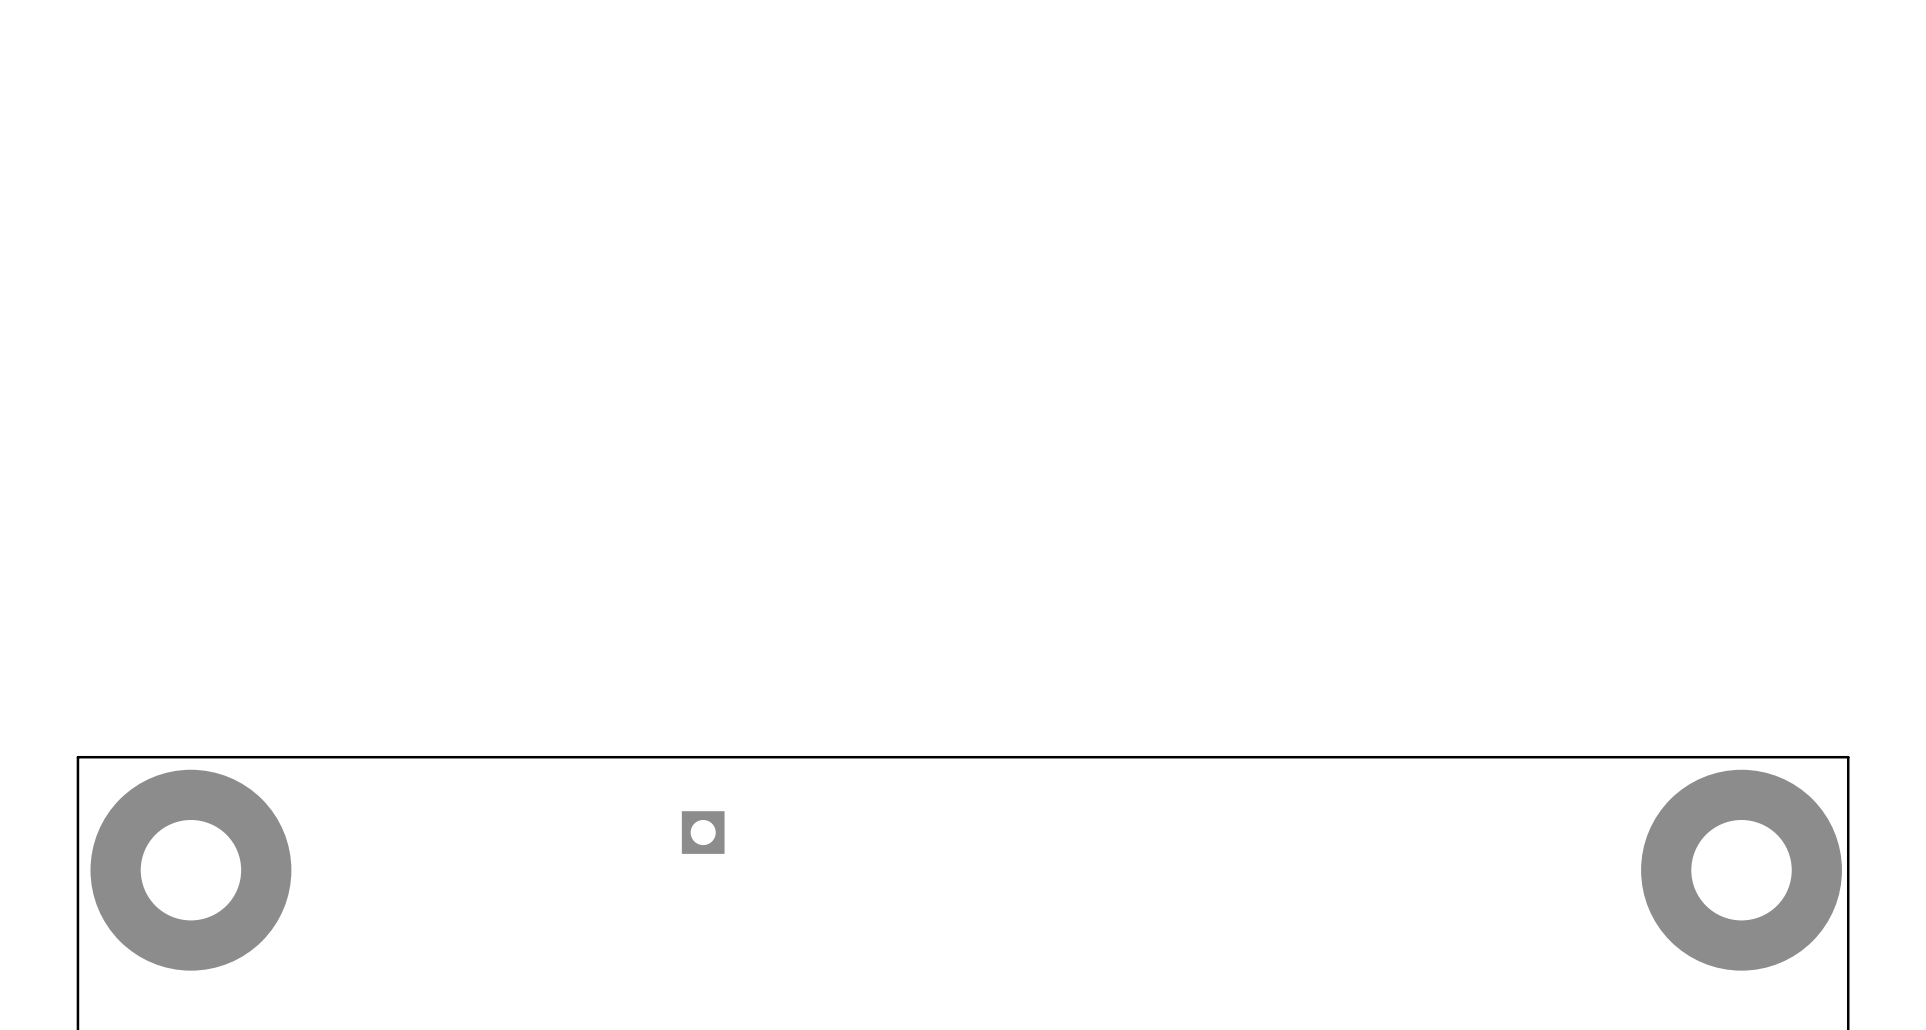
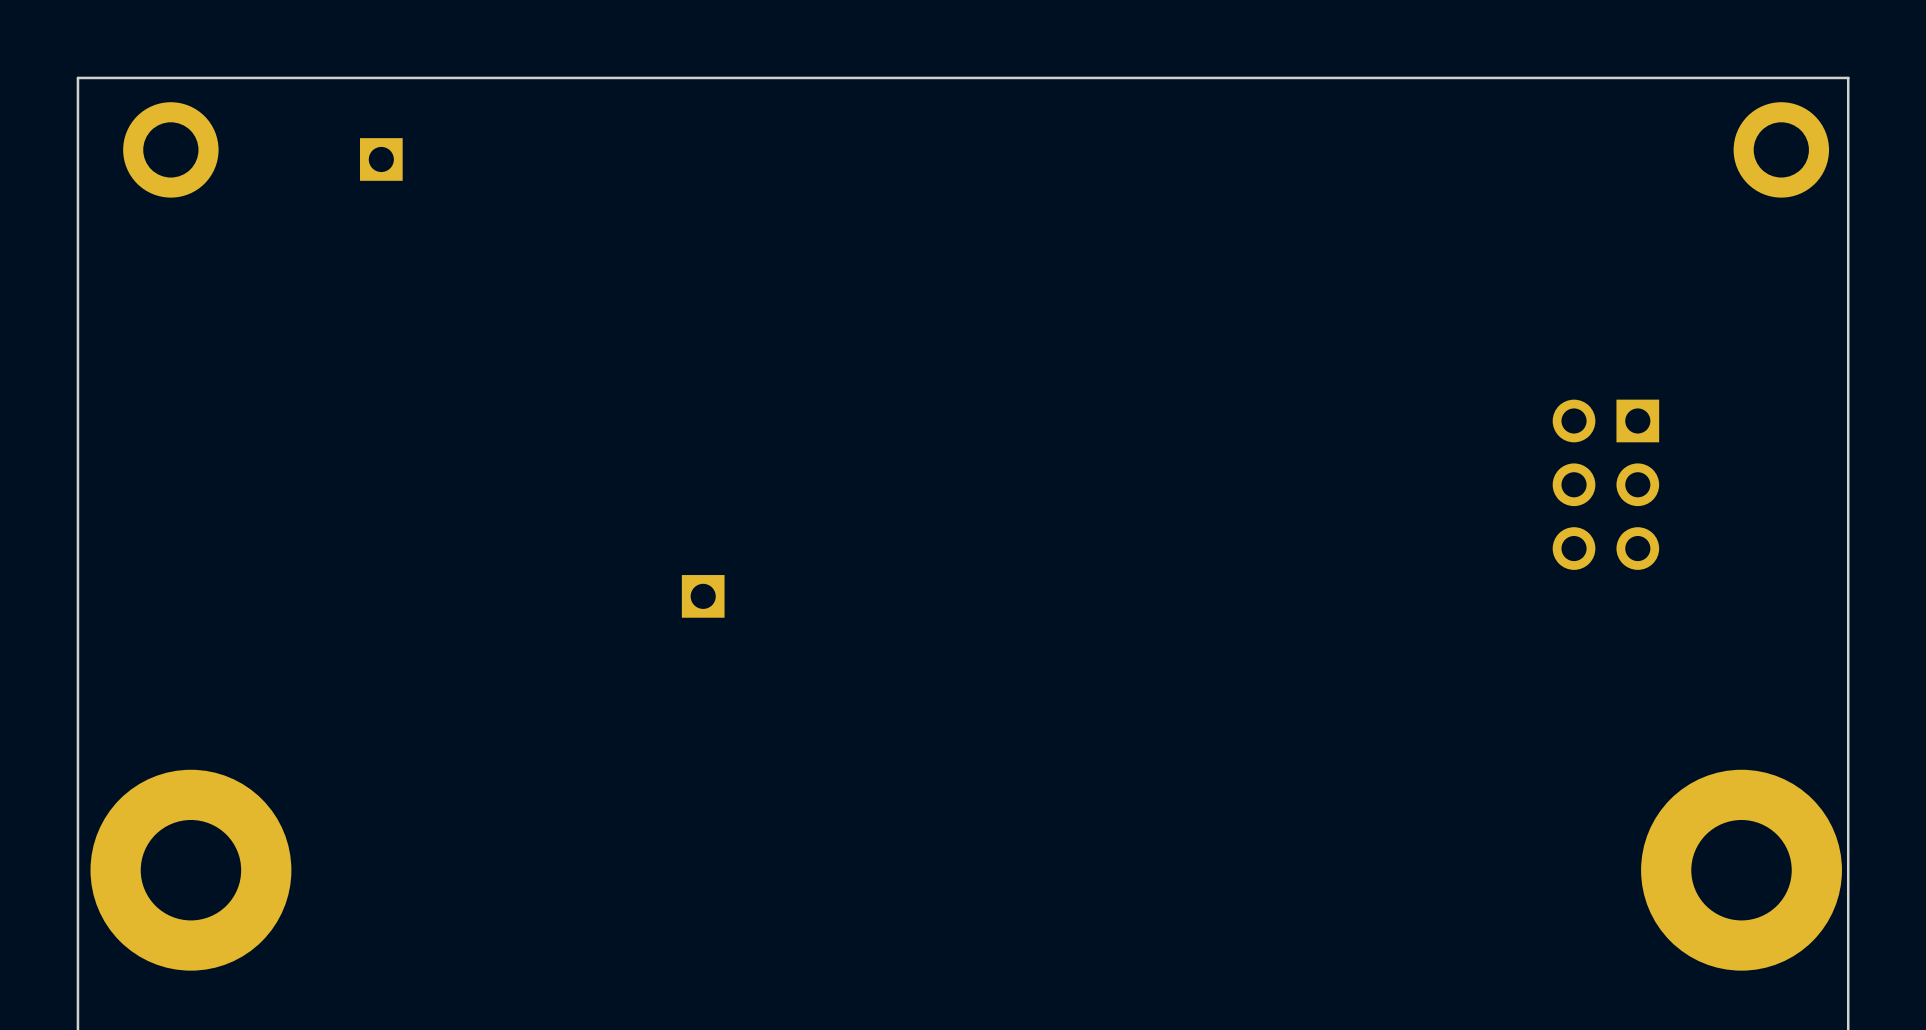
part: none -> (170, 149)
part: none -> (1781, 149)
part: none -> (381, 159)
part: none -> (1605, 484)
board edge: (1848, 757) (77, 757) -> (1848, 757) (1848, 77) (77, 77) (77, 757)
part position: (703, 832) -> (703, 596)

